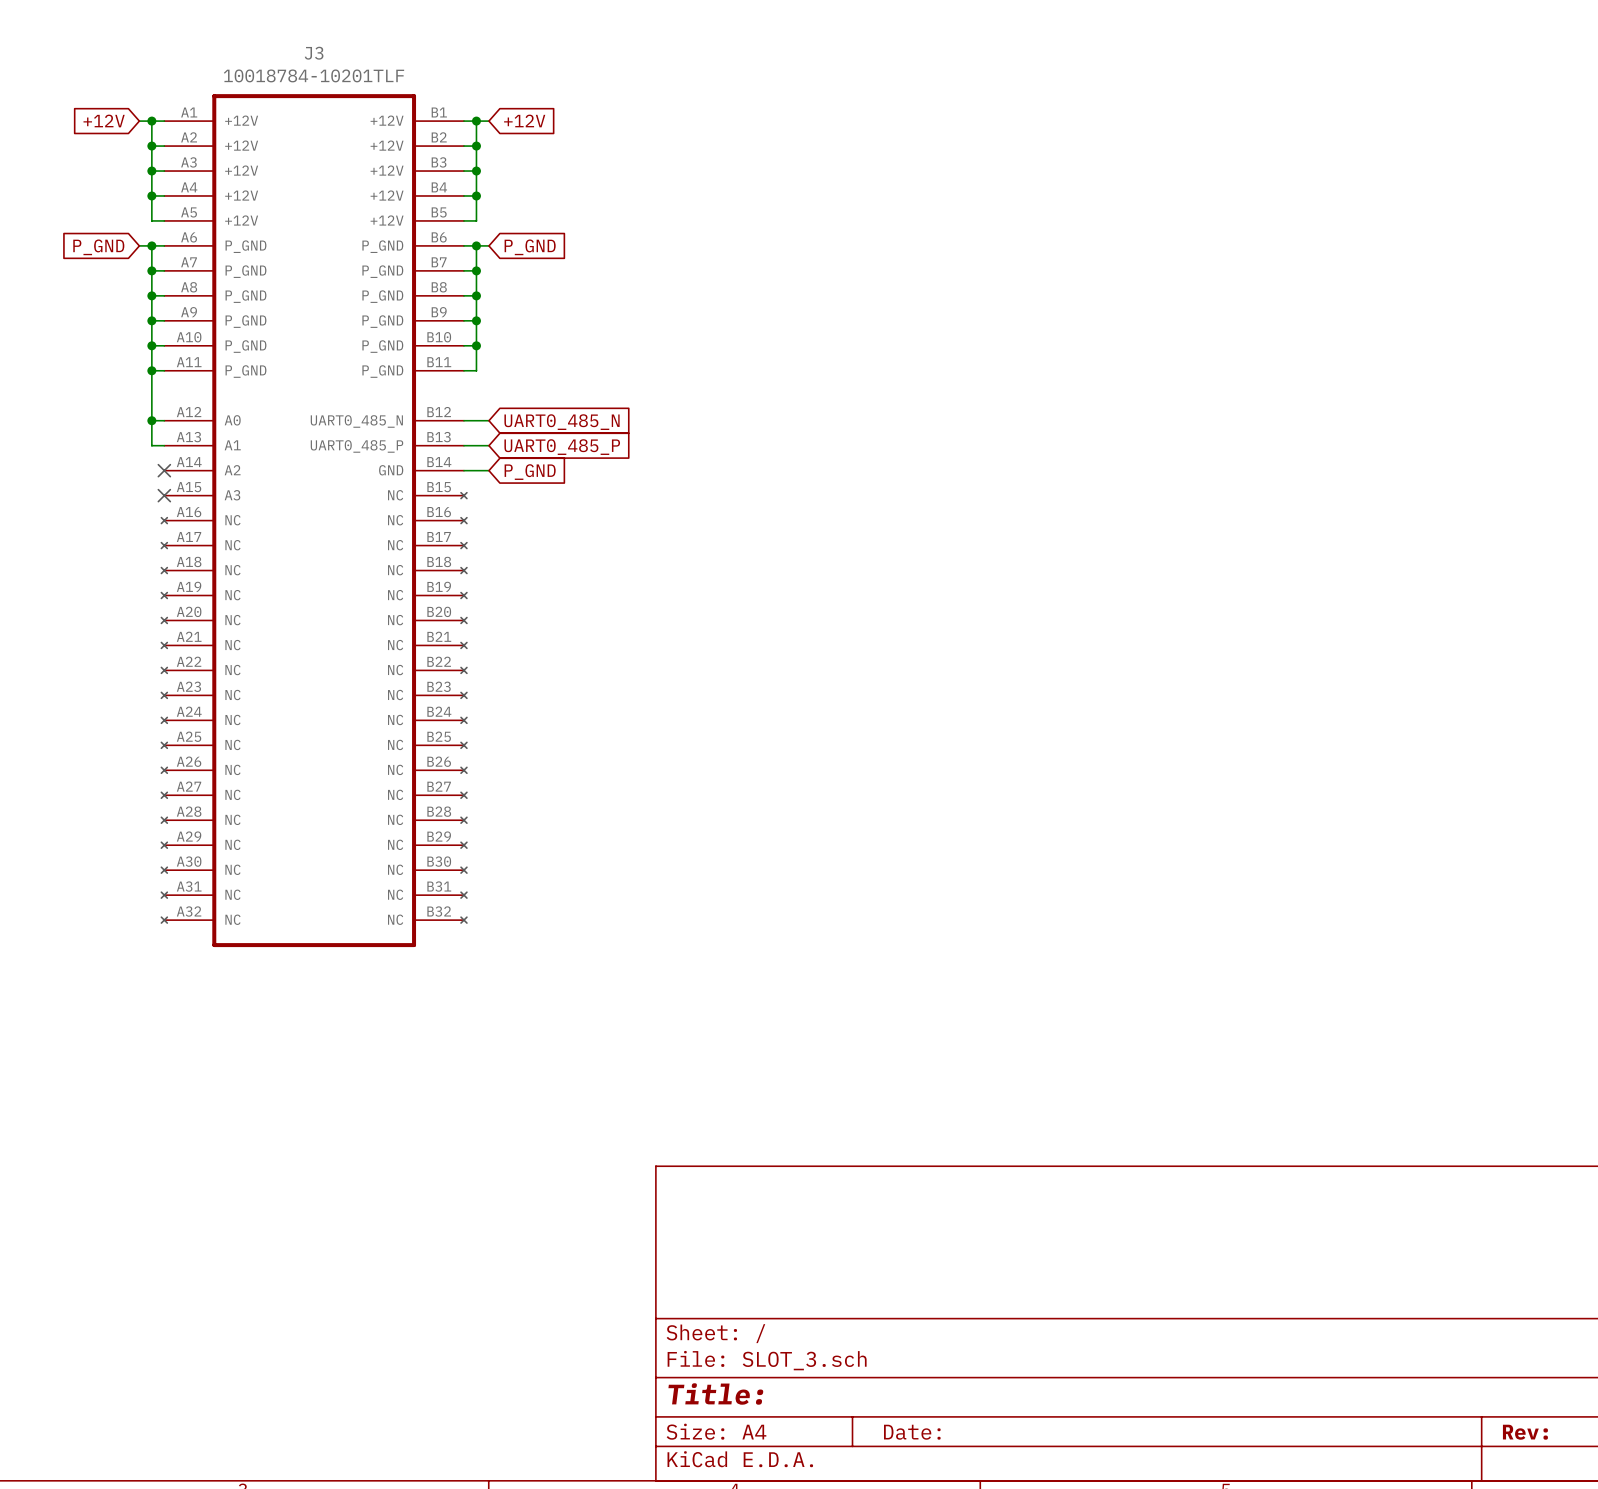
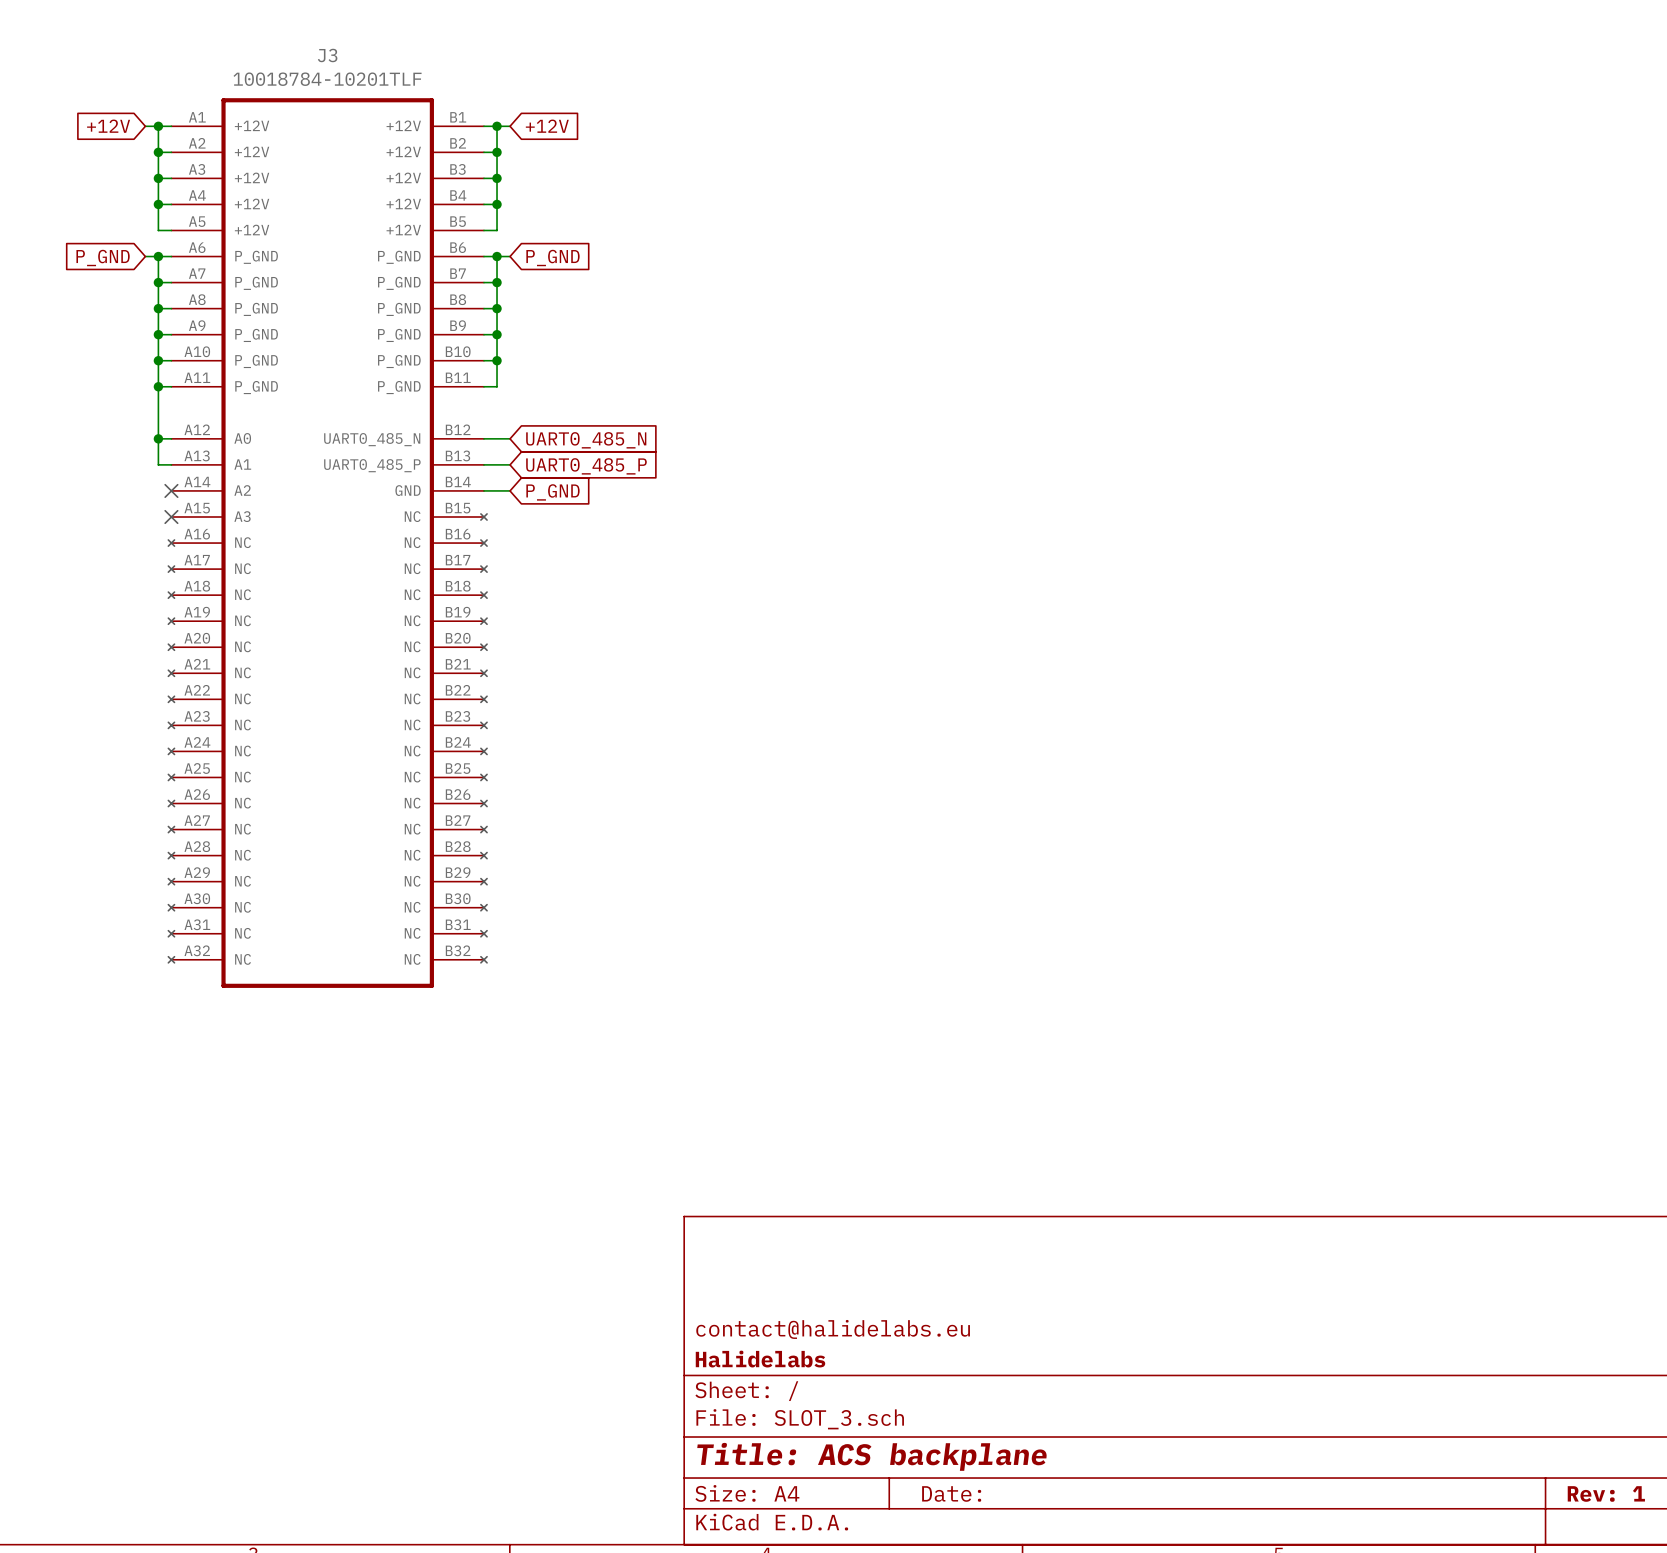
title block: none -> contact@halidelabs.eu (833, 1329)
title block: none -> Halidelabs (760, 1359)
title block: Title: (715, 1393) -> Title: ACS backplane (872, 1456)
title block: Rev: (1525, 1432) -> Rev: 1 (1606, 1493)

